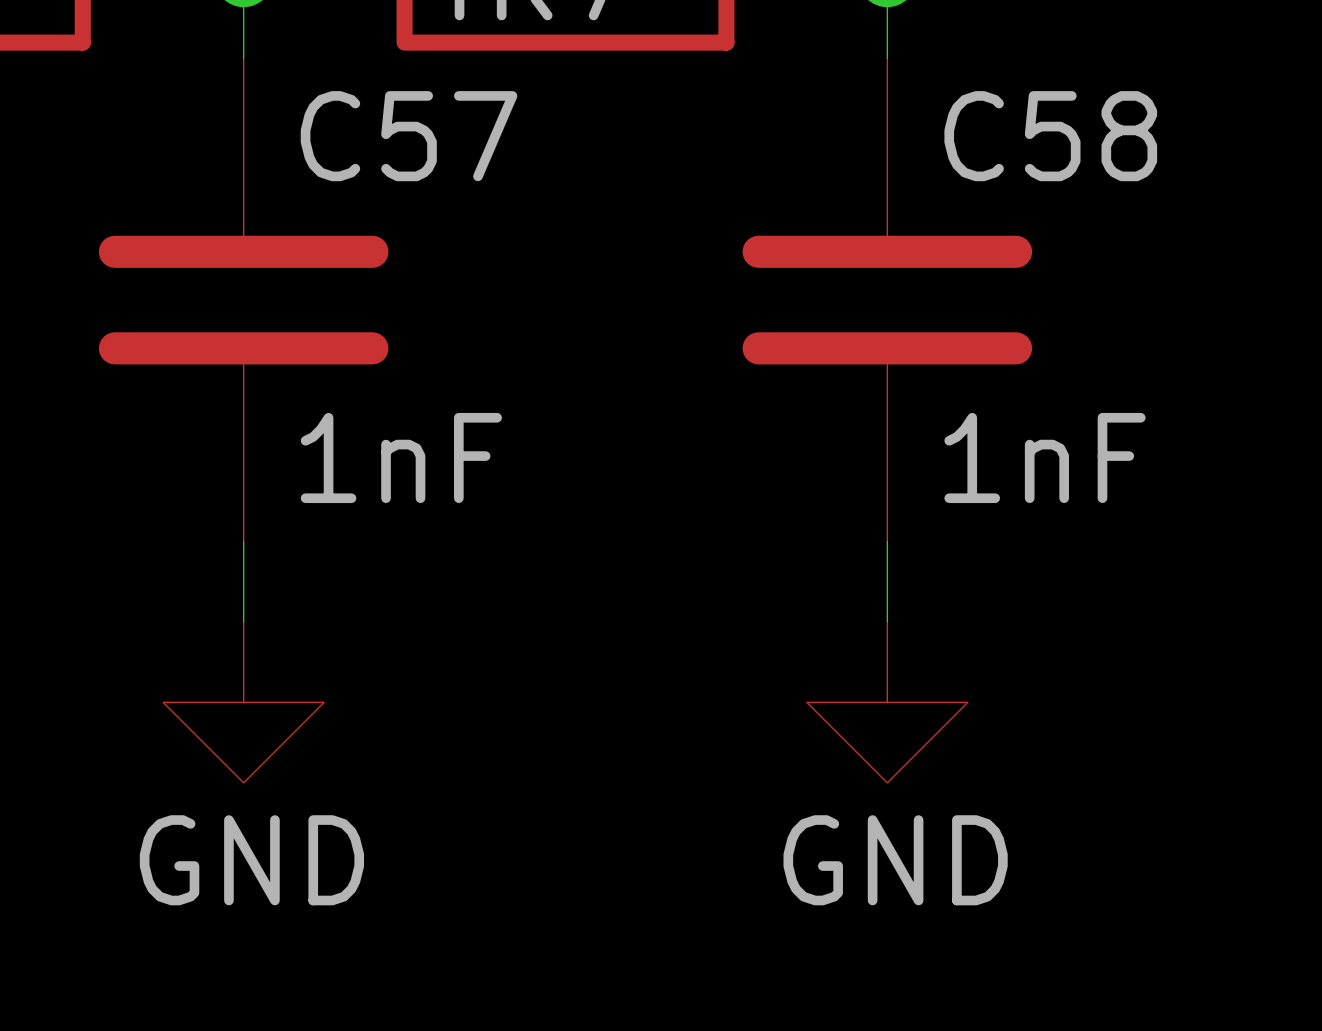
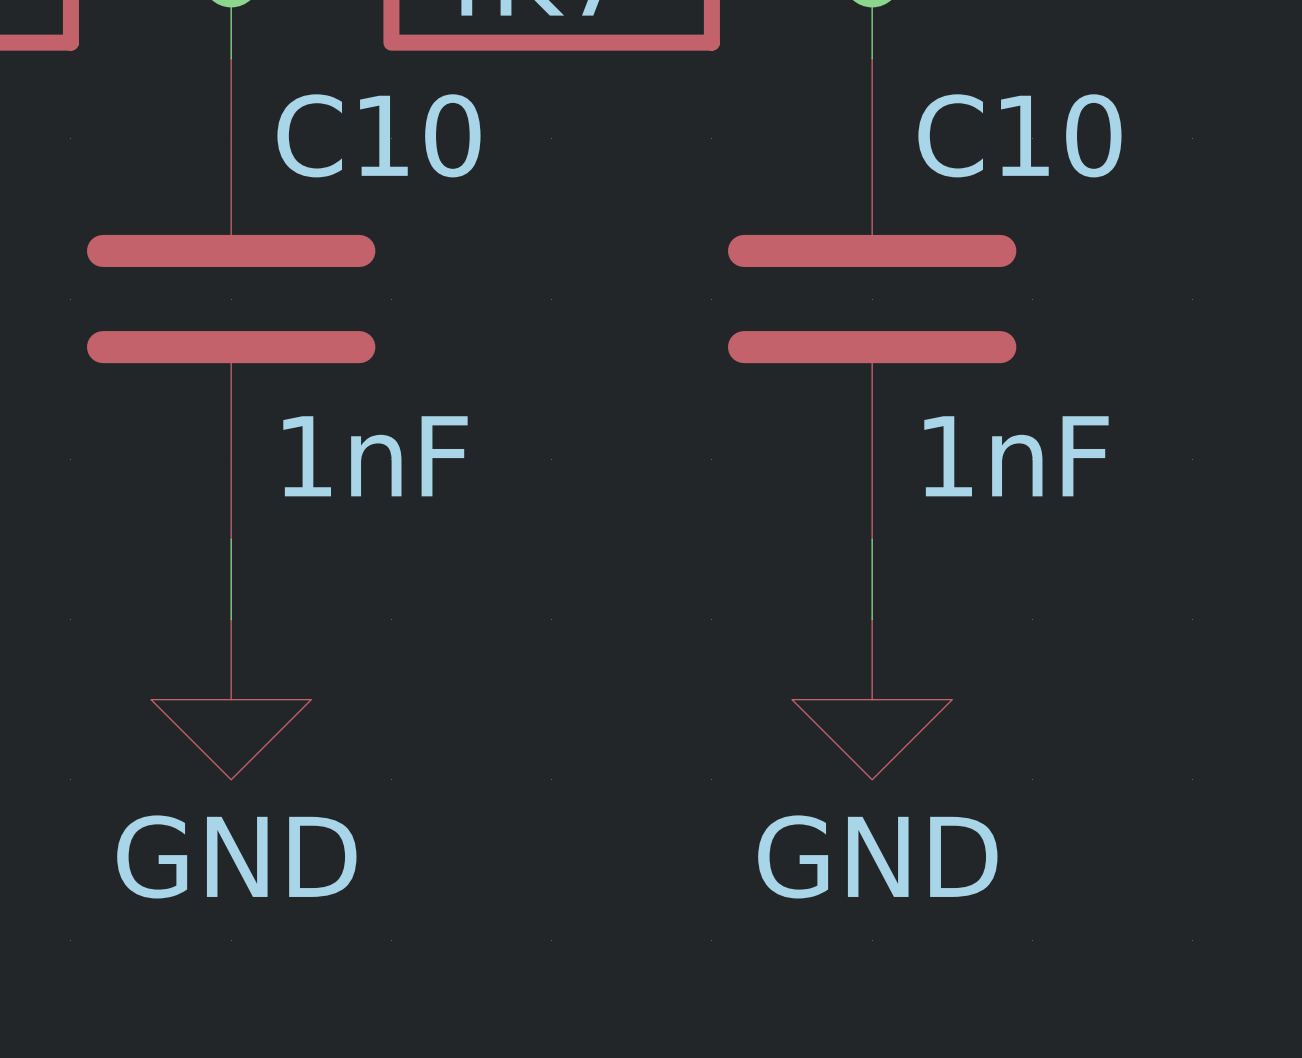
C57 name: C57 (409, 136) -> C10 (378, 135)
C58 name: C58 (1050, 136) -> C10 (1019, 135)

